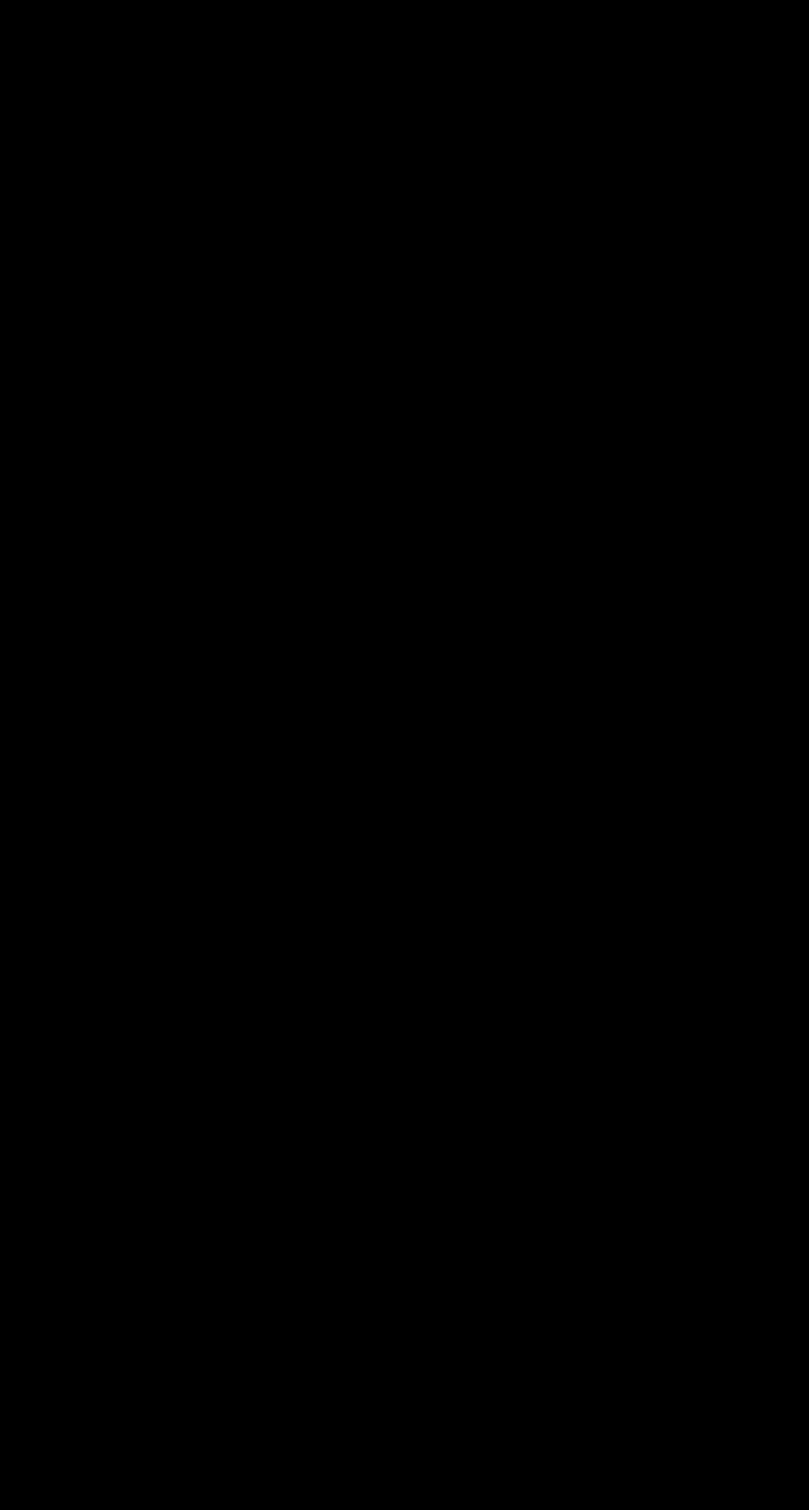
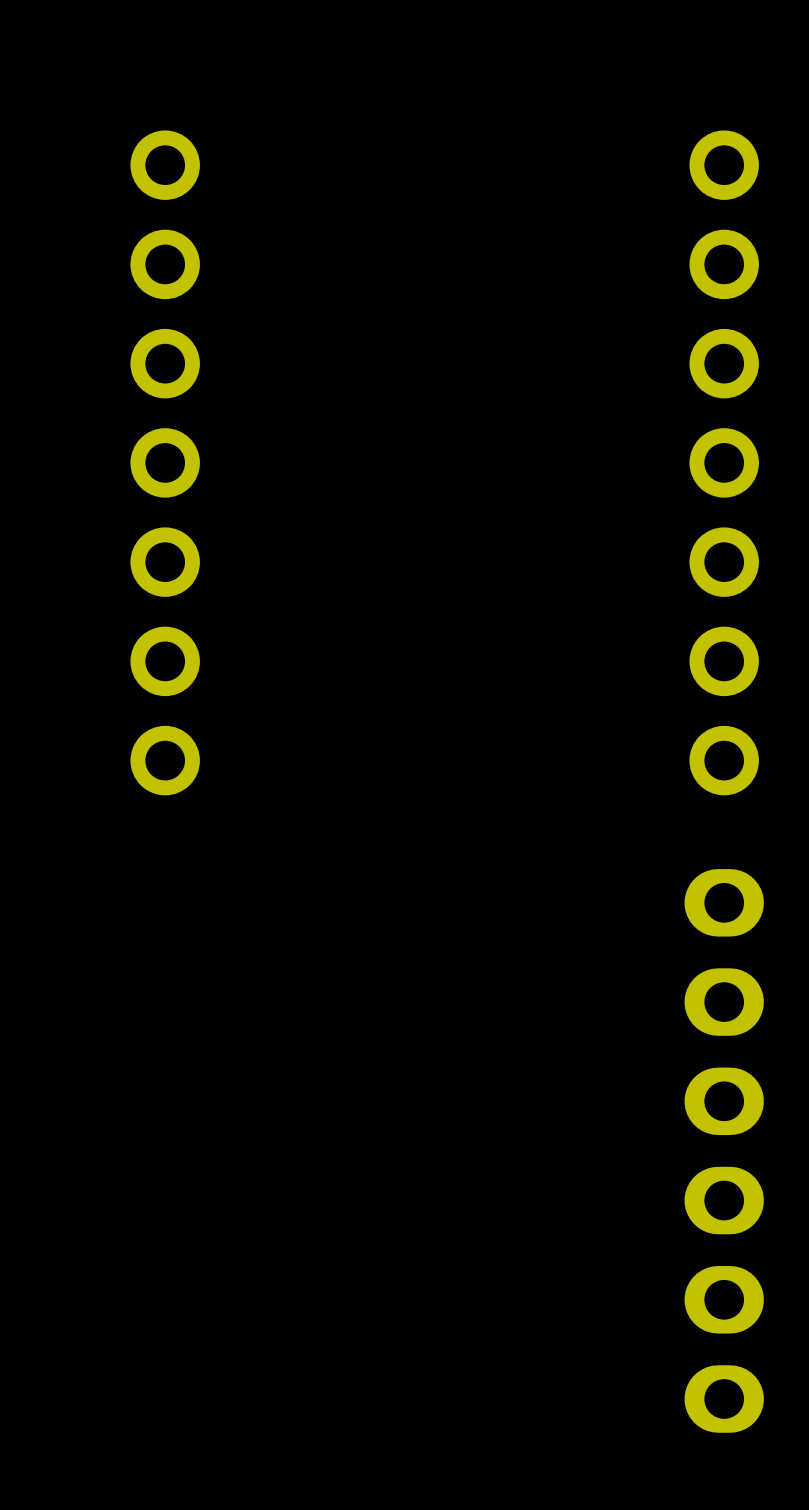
part: none -> (165, 462)
part: none -> (724, 462)
part: none -> (724, 1150)

